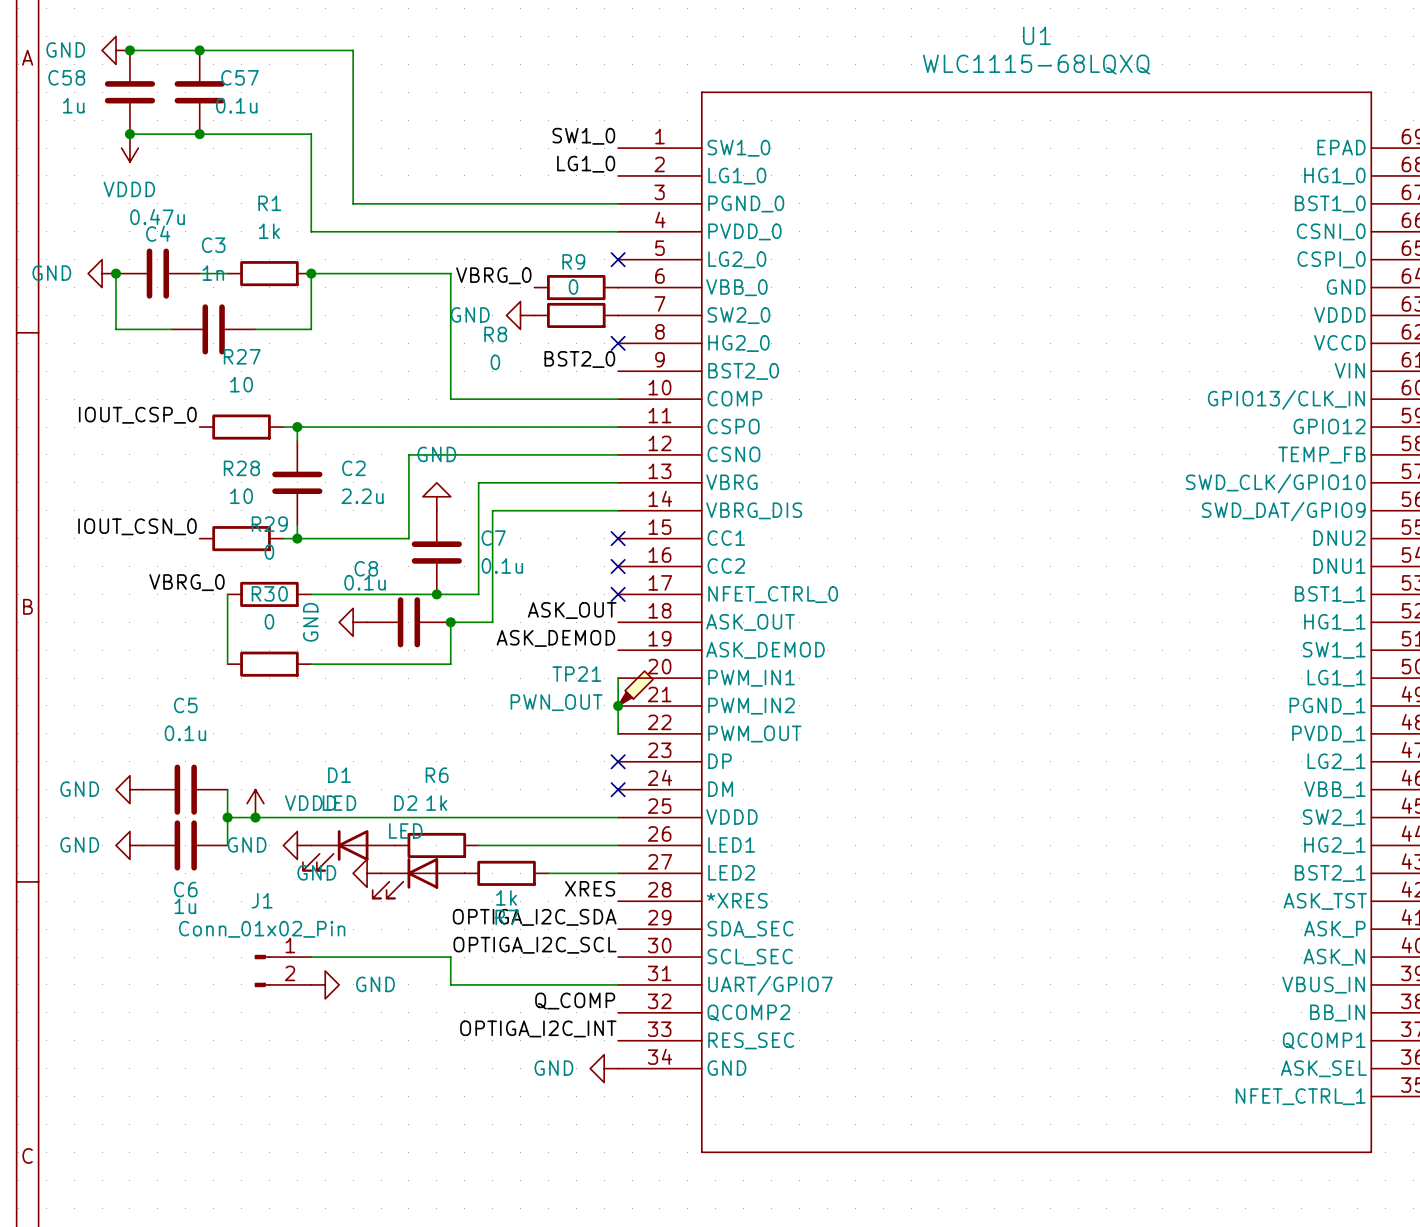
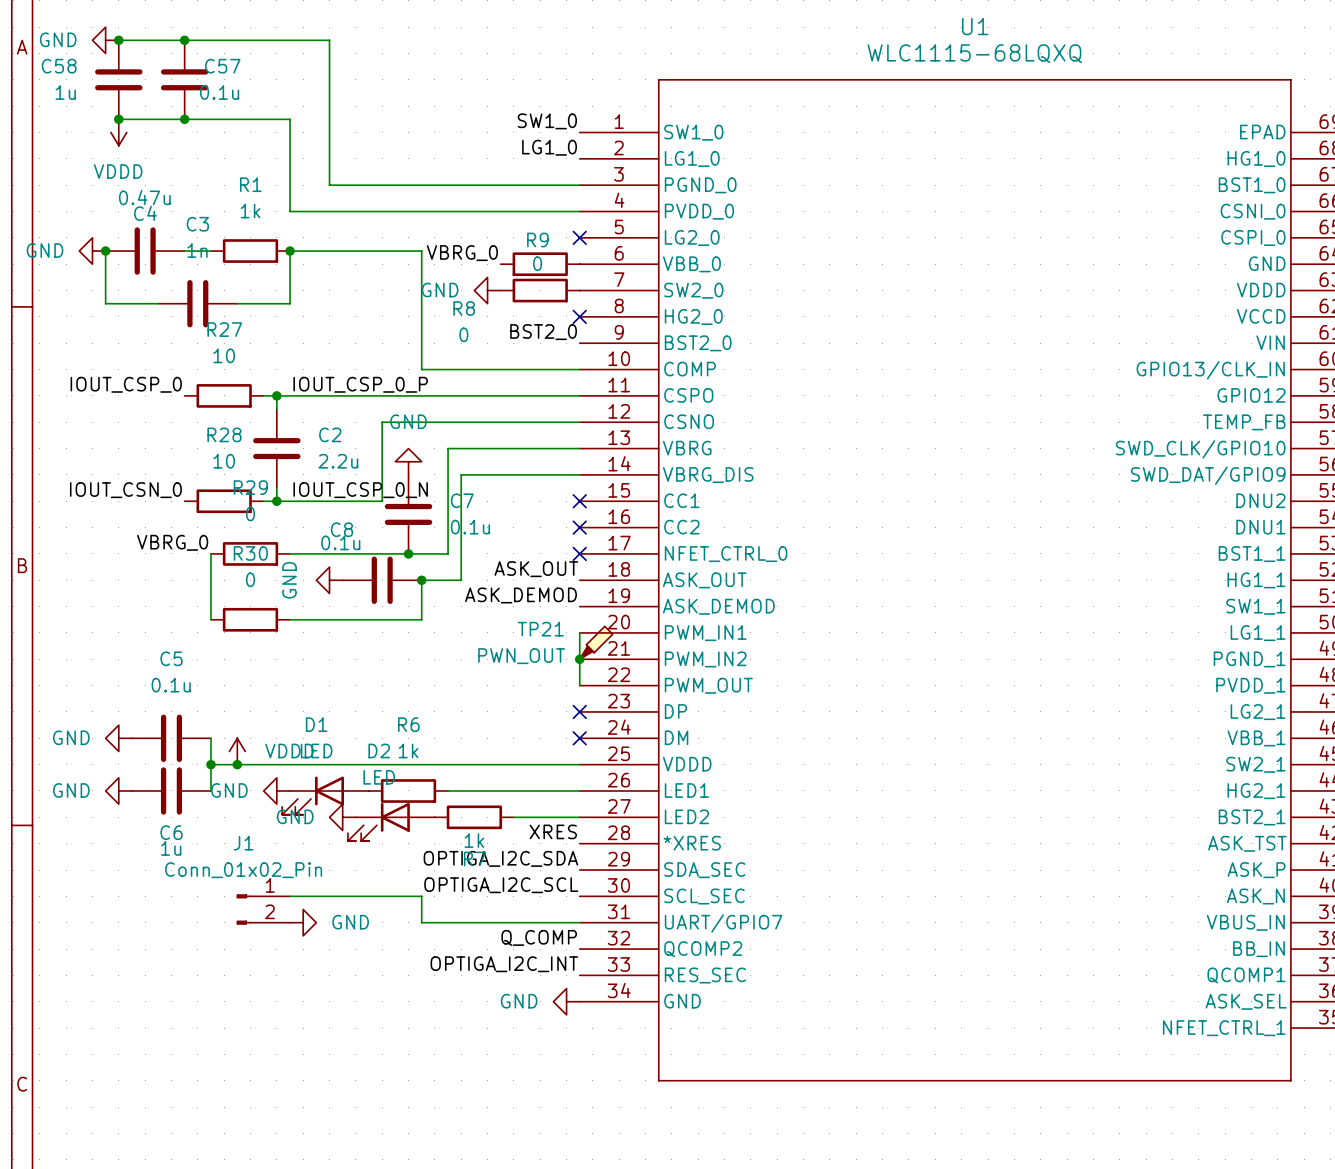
label: none -> IOUT_CSP_0_P (360, 384)
label: none -> IOUT_CSP_0_N (360, 490)

